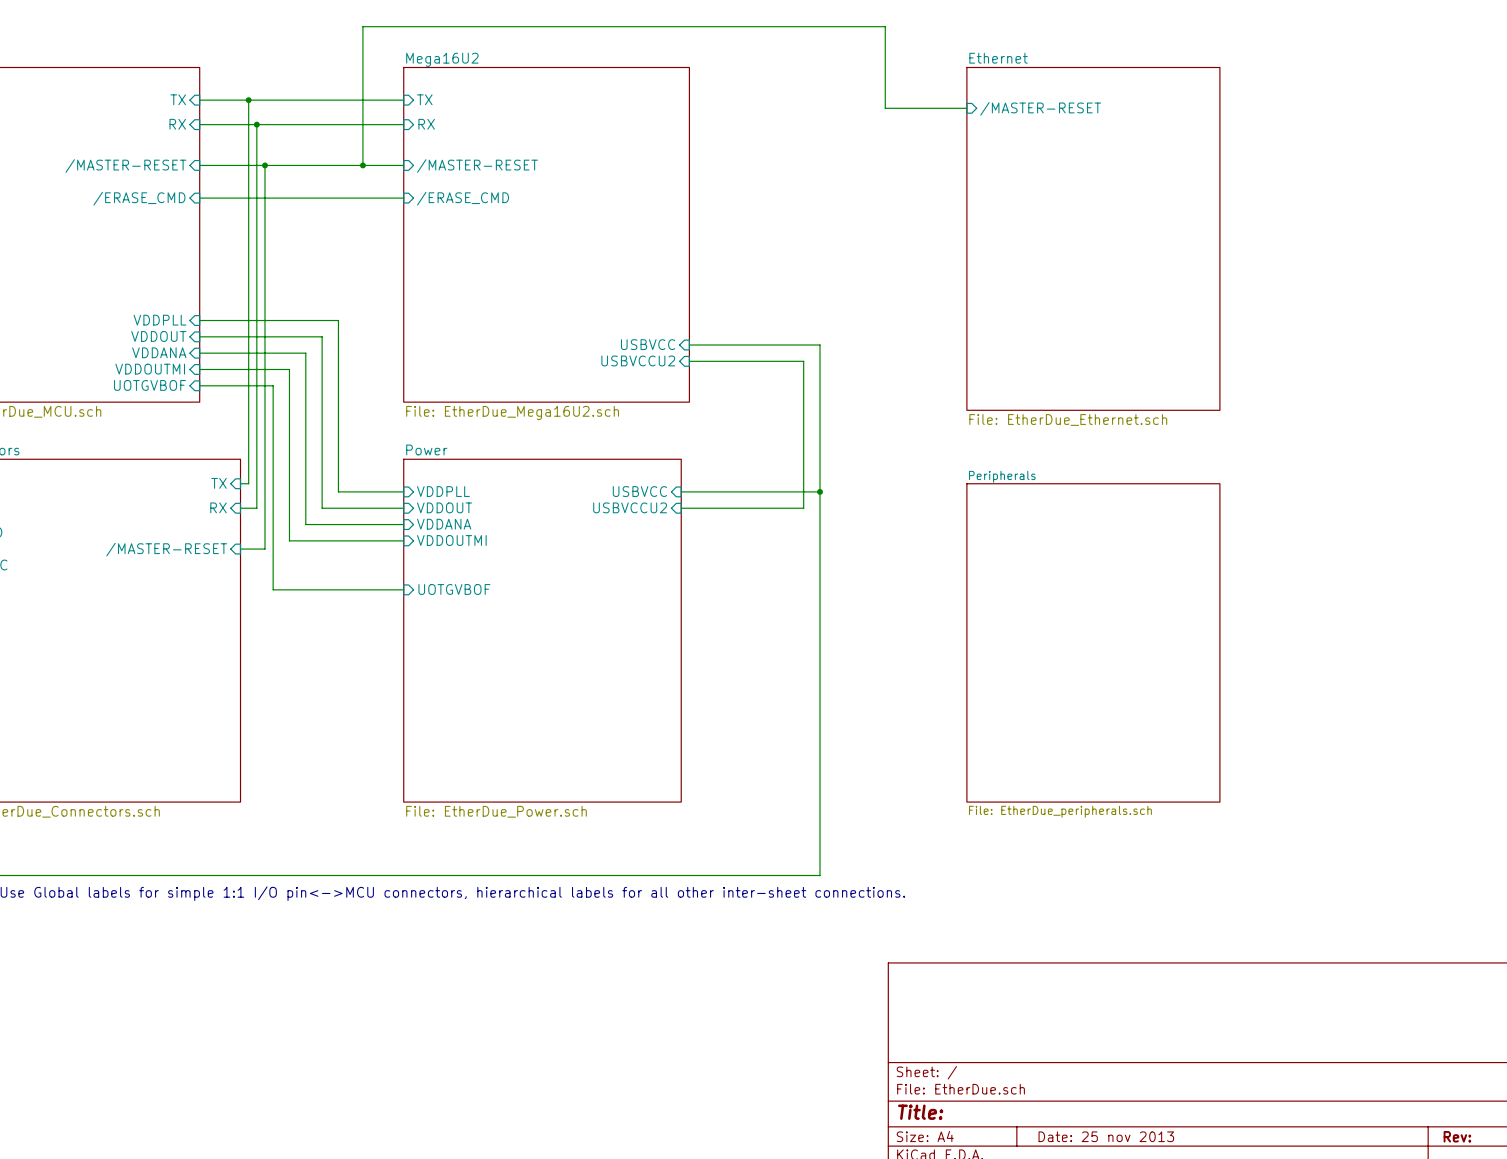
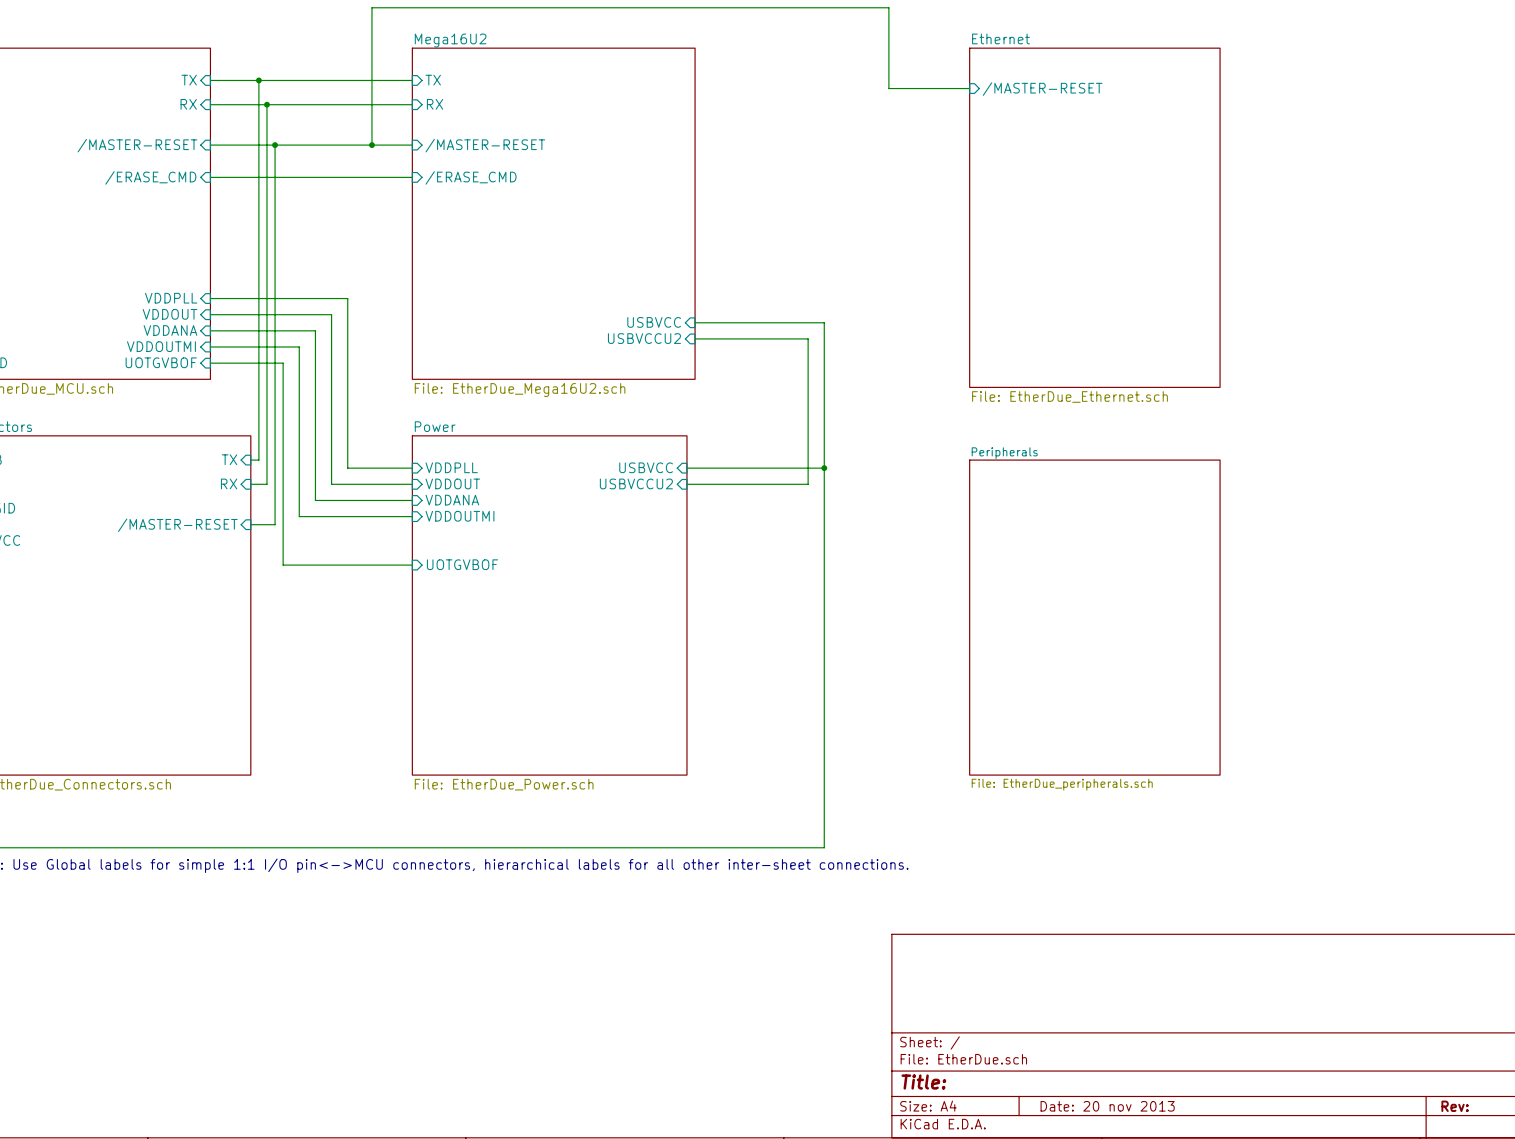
title block: Date: 25 nov 2013 (1106, 1136) -> Date: 20 nov 2013 (1107, 1106)

